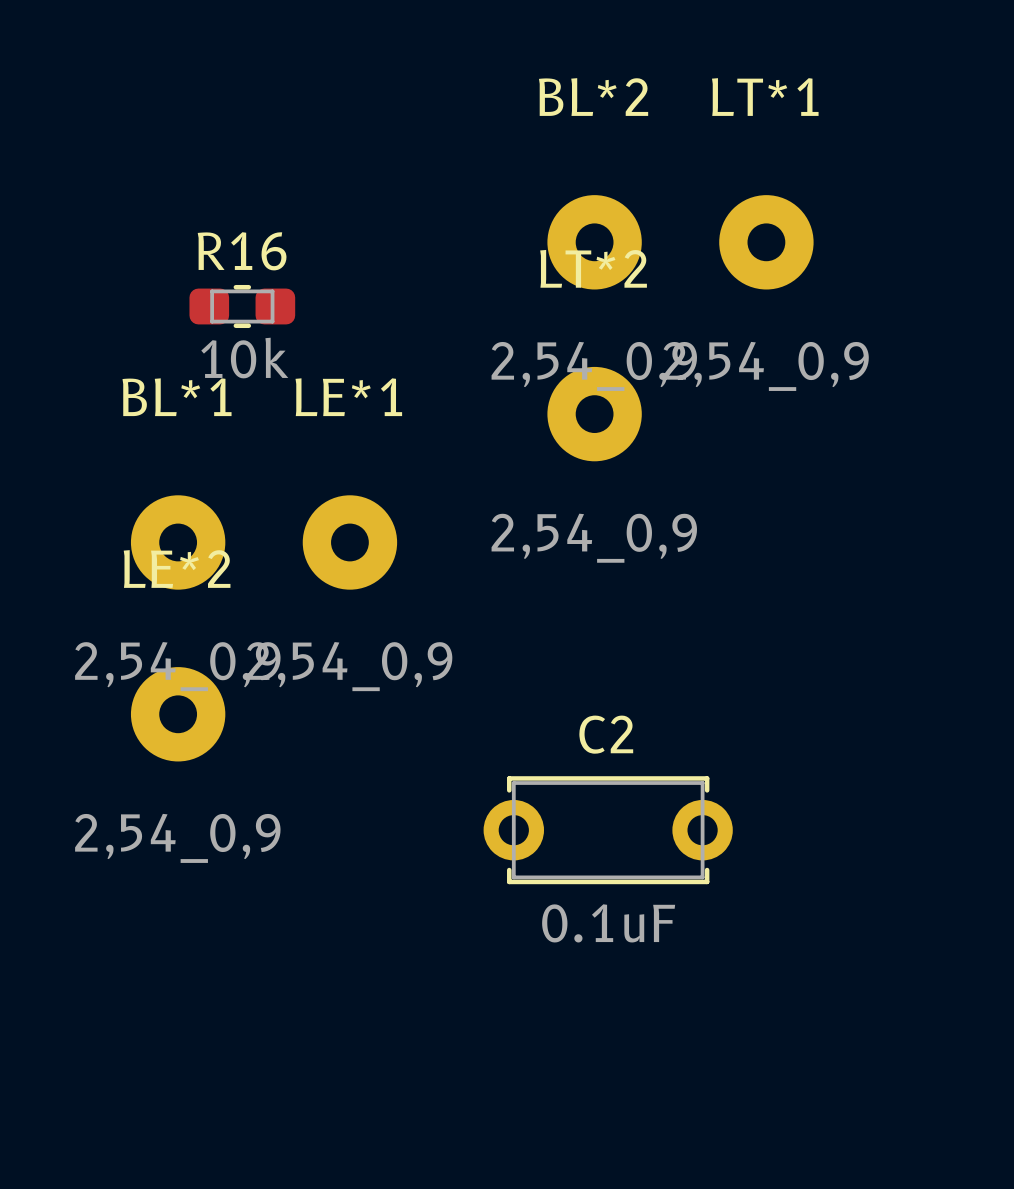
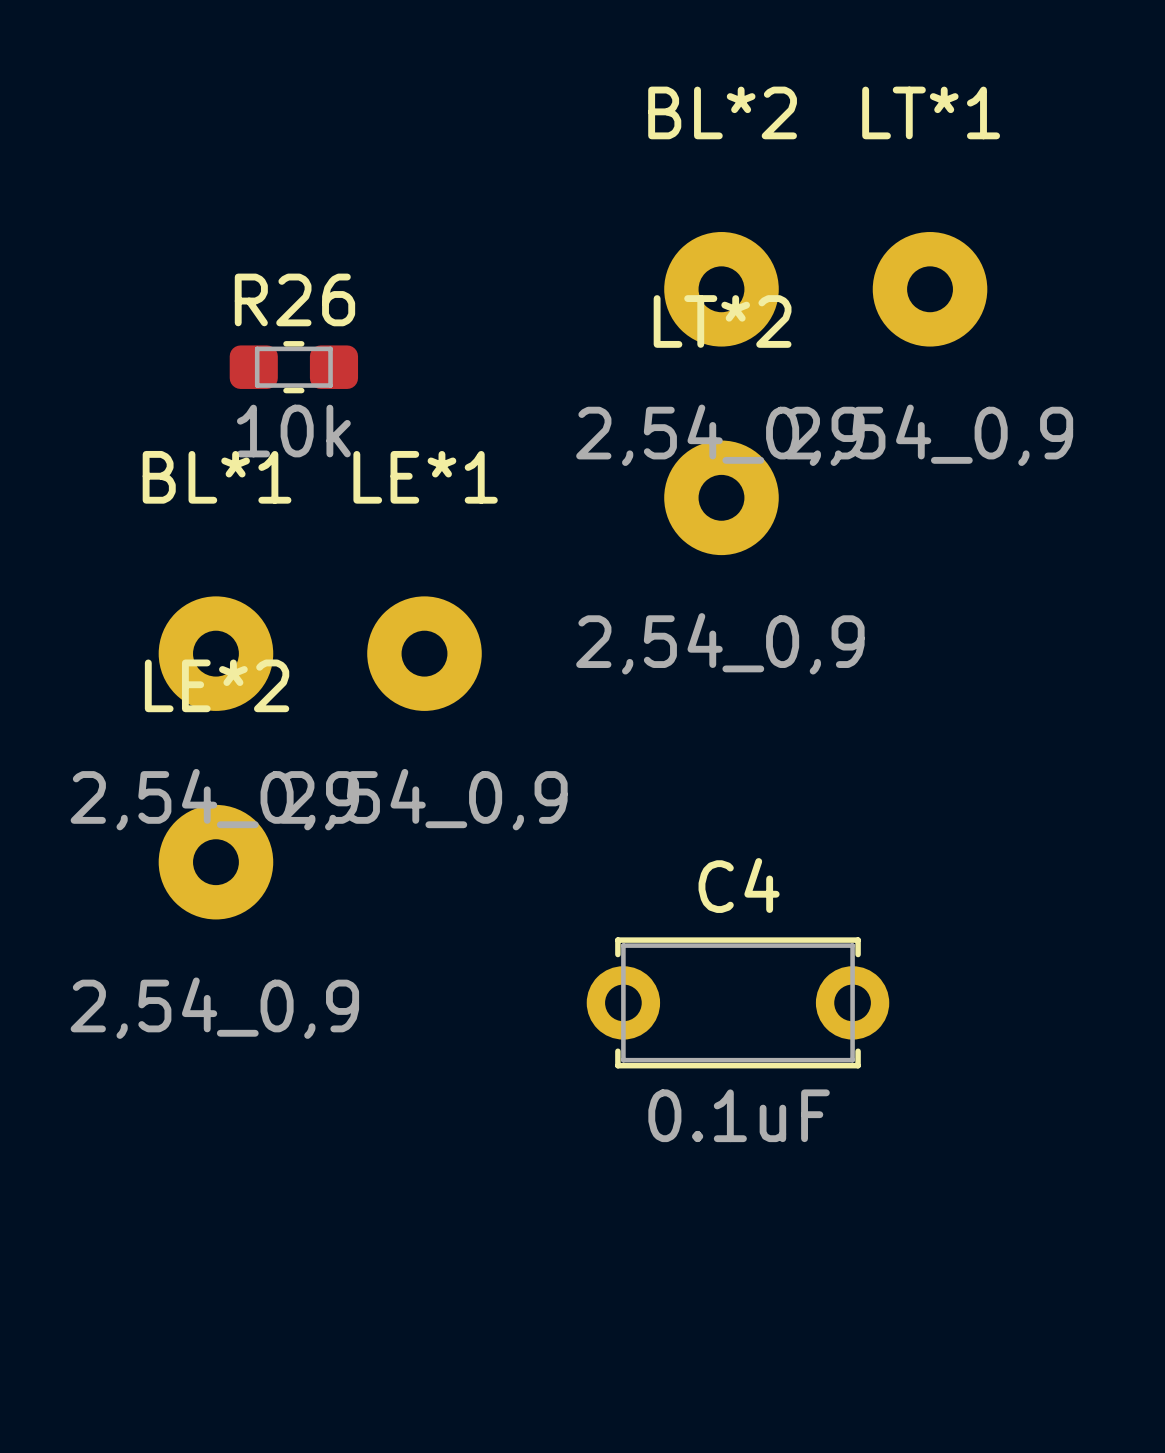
R16 name: R16 (242, 251) -> R26 (294, 299)
C2 name: C2 (606, 734) -> C4 (739, 885)

